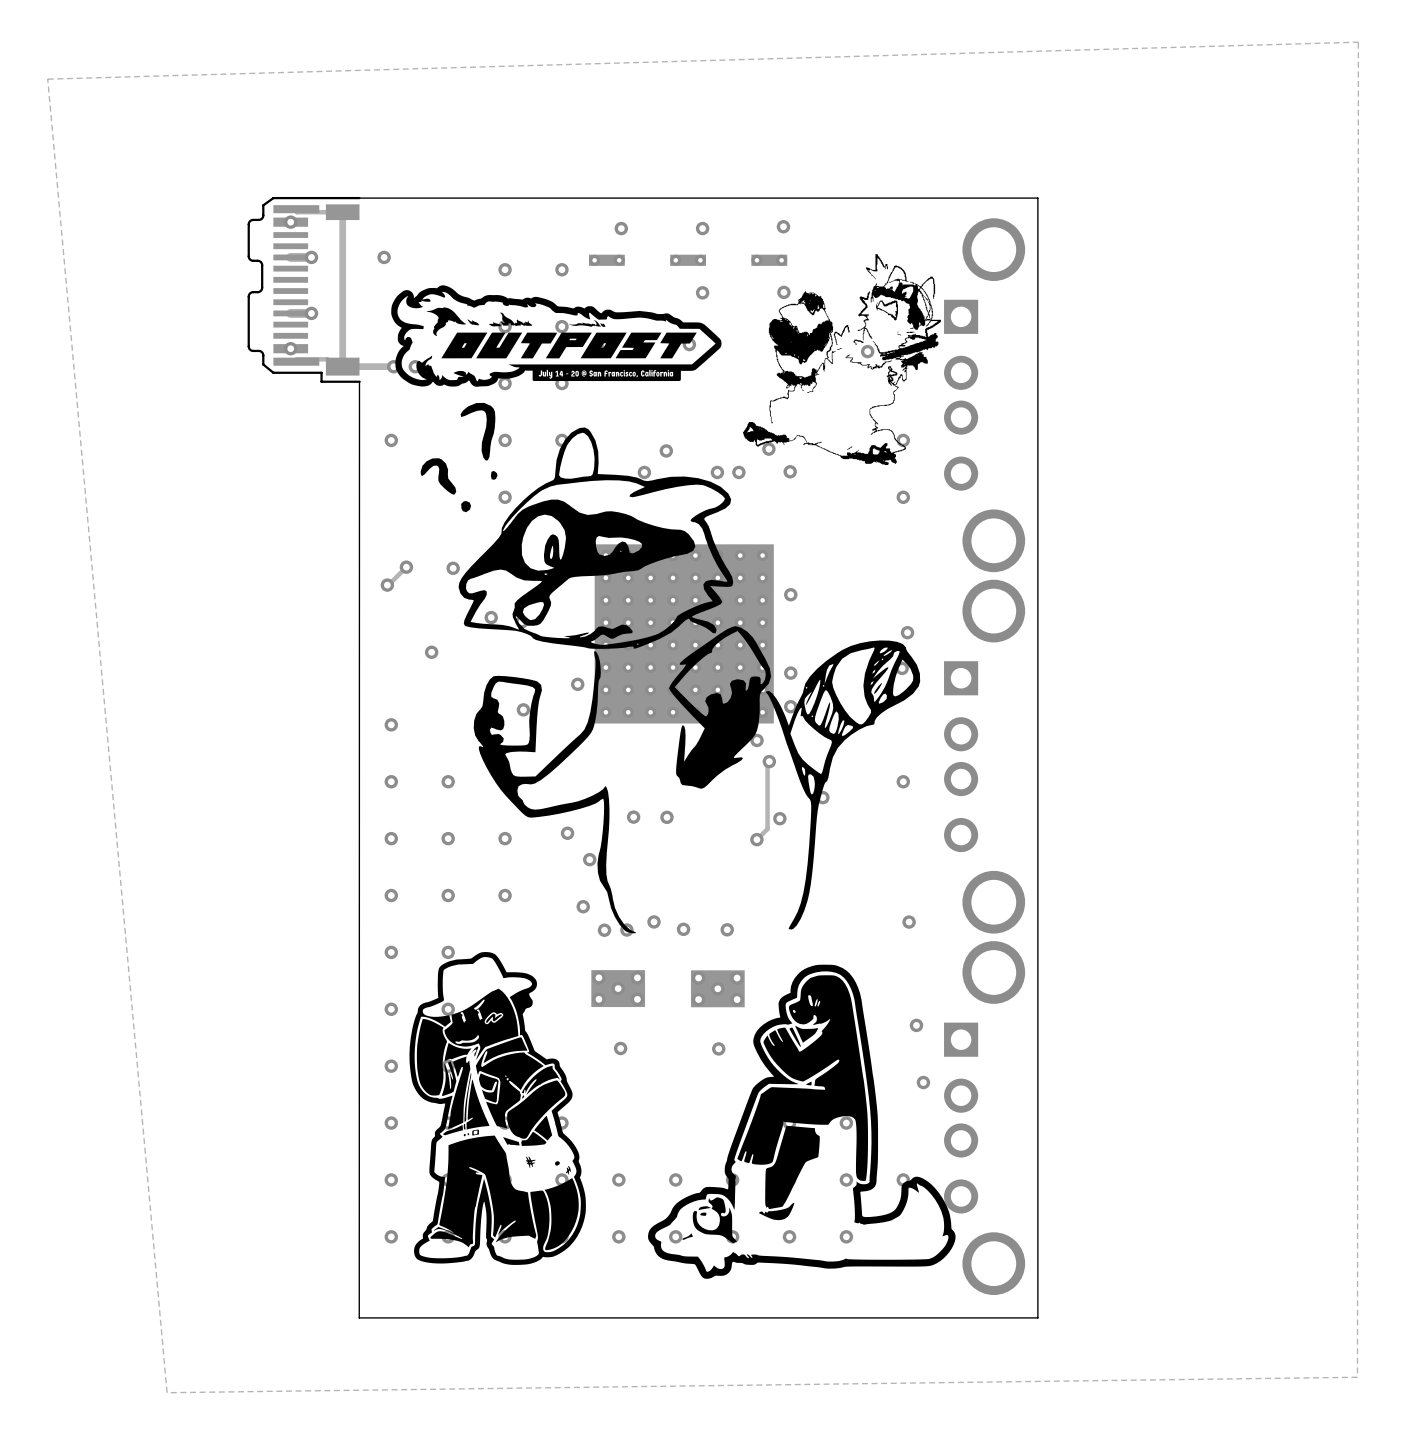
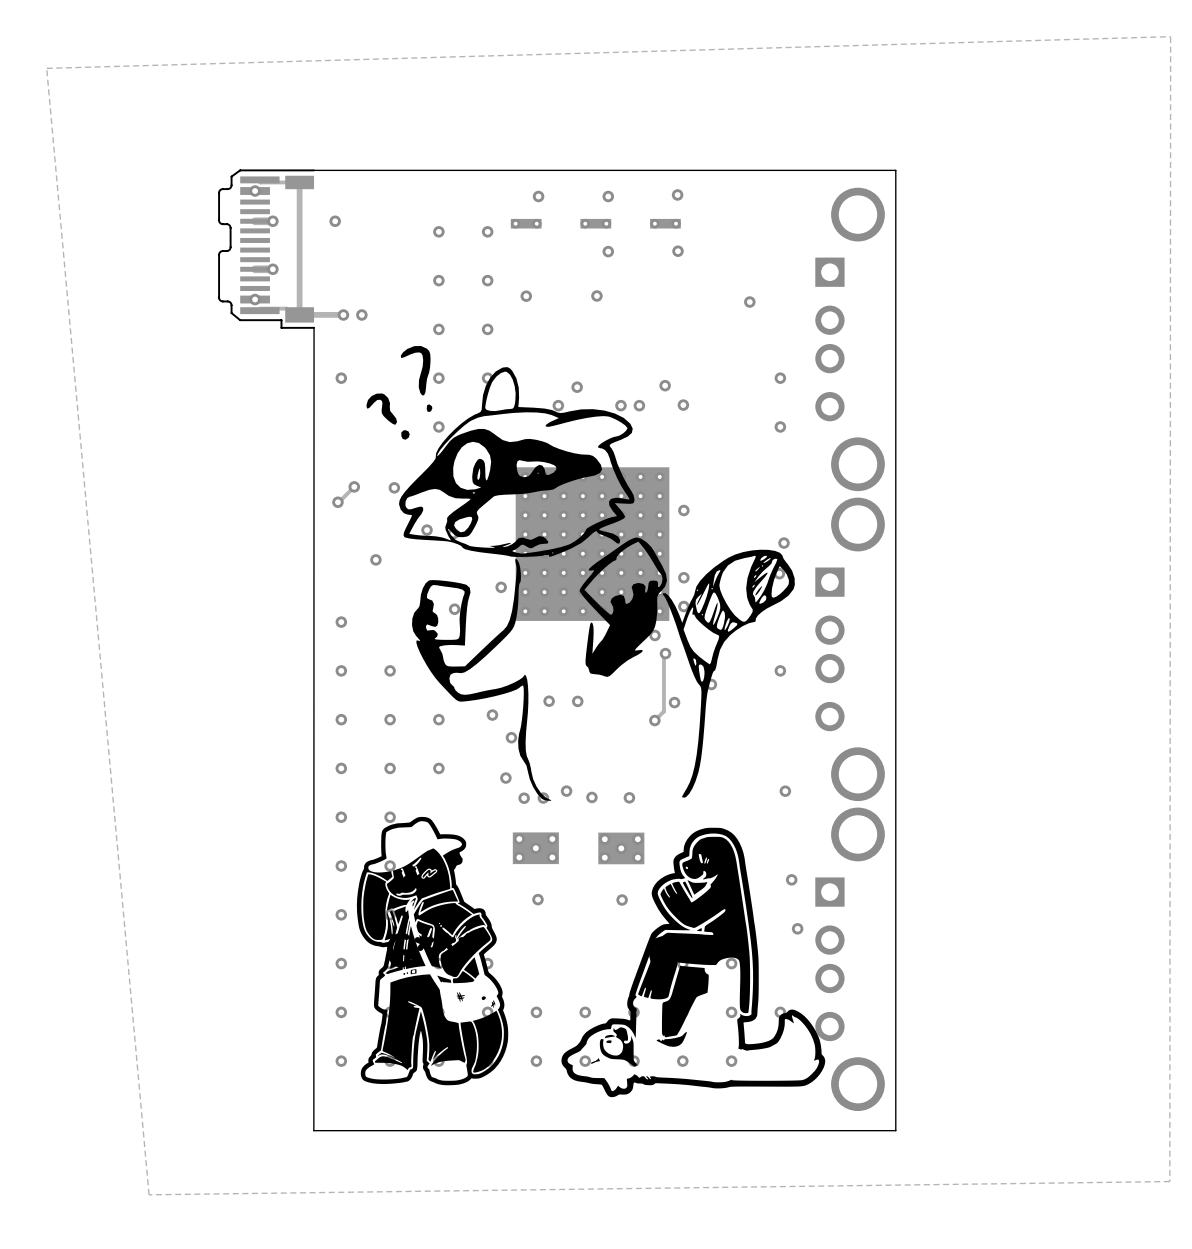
drawing: [391, 254, 942, 466] -> none
drawing: [409, 952, 586, 1265] -> none
drawing: [647, 964, 956, 1279] -> none
part: none -> (432, 951)
part: none -> (693, 962)

